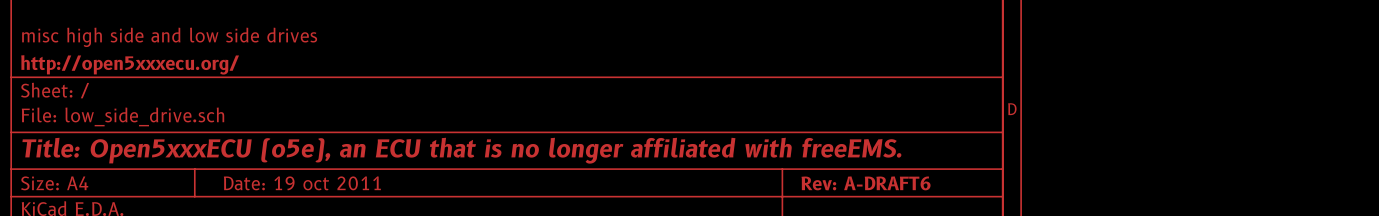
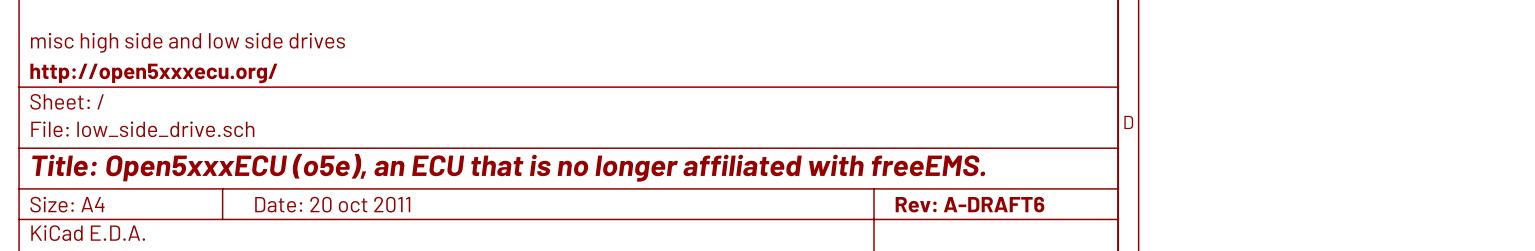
title block: Date: 19 oct 2011 (302, 183) -> Date: 20 oct 2011 (332, 204)

